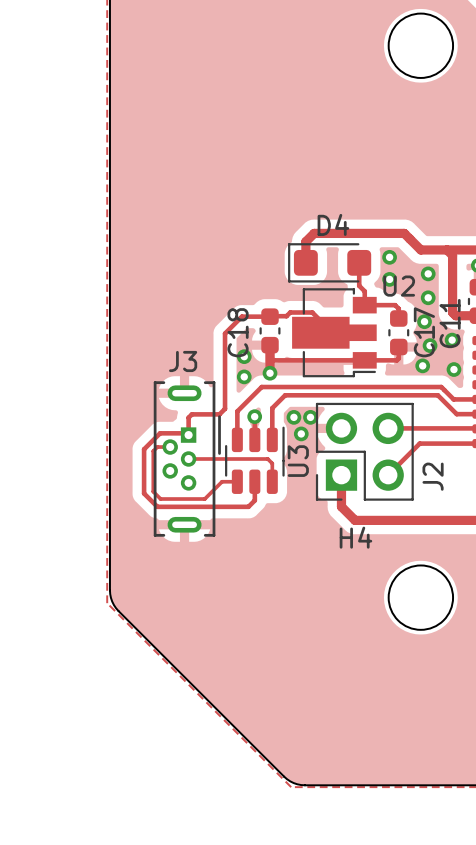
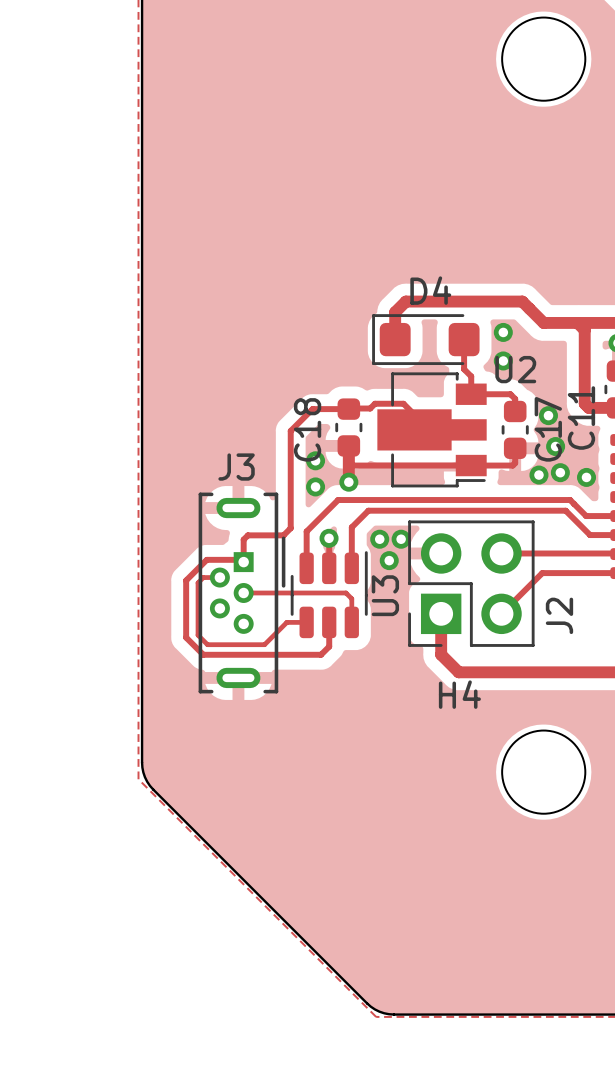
via: (428, 273) -> none
via: (428, 297) -> none
via: (452, 340) -> none
via: (422, 365) -> none
via: none -> (560, 472)
via: none -> (538, 475)

